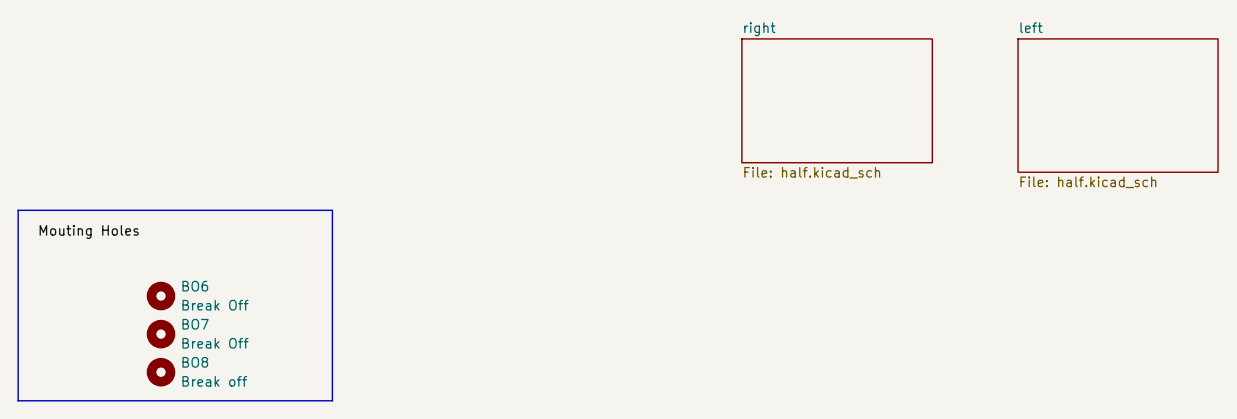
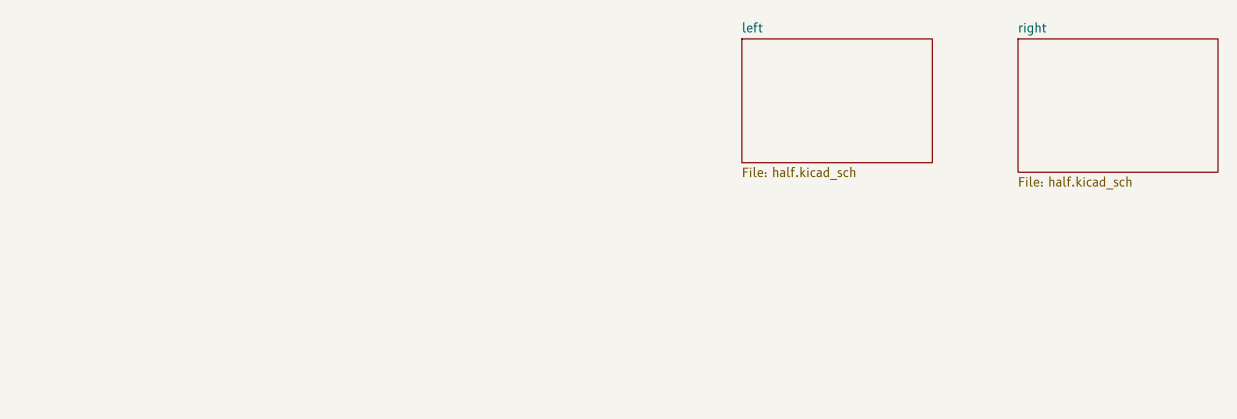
sheet left name: left (1031, 27) -> right (1032, 28)
sheet right name: right (759, 29) -> left (752, 27)
line: (18, 210) (332, 210) (332, 400) (18, 400) (18, 210) -> none
label: Mouting Holes (89, 231) -> none
BO6: Break Off (161, 296) -> none
BO7: Break Off (161, 334) -> none
BO8: Break off (161, 372) -> none

